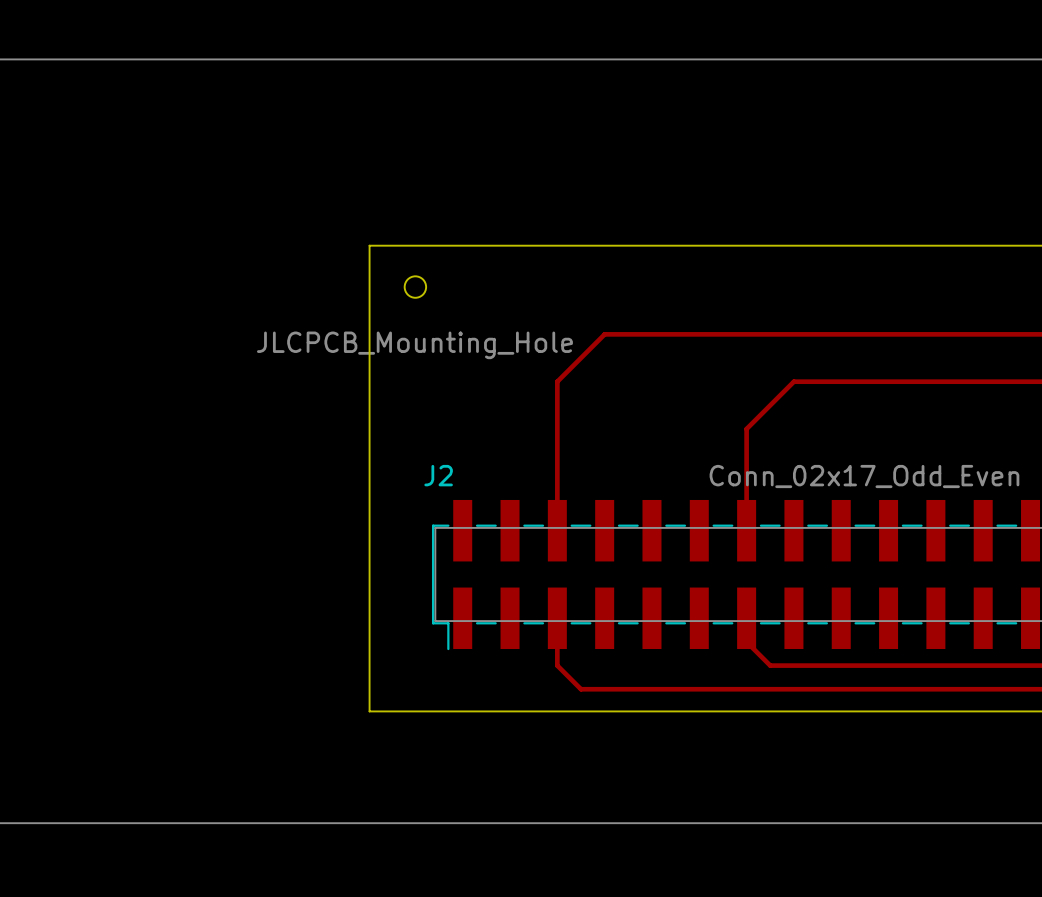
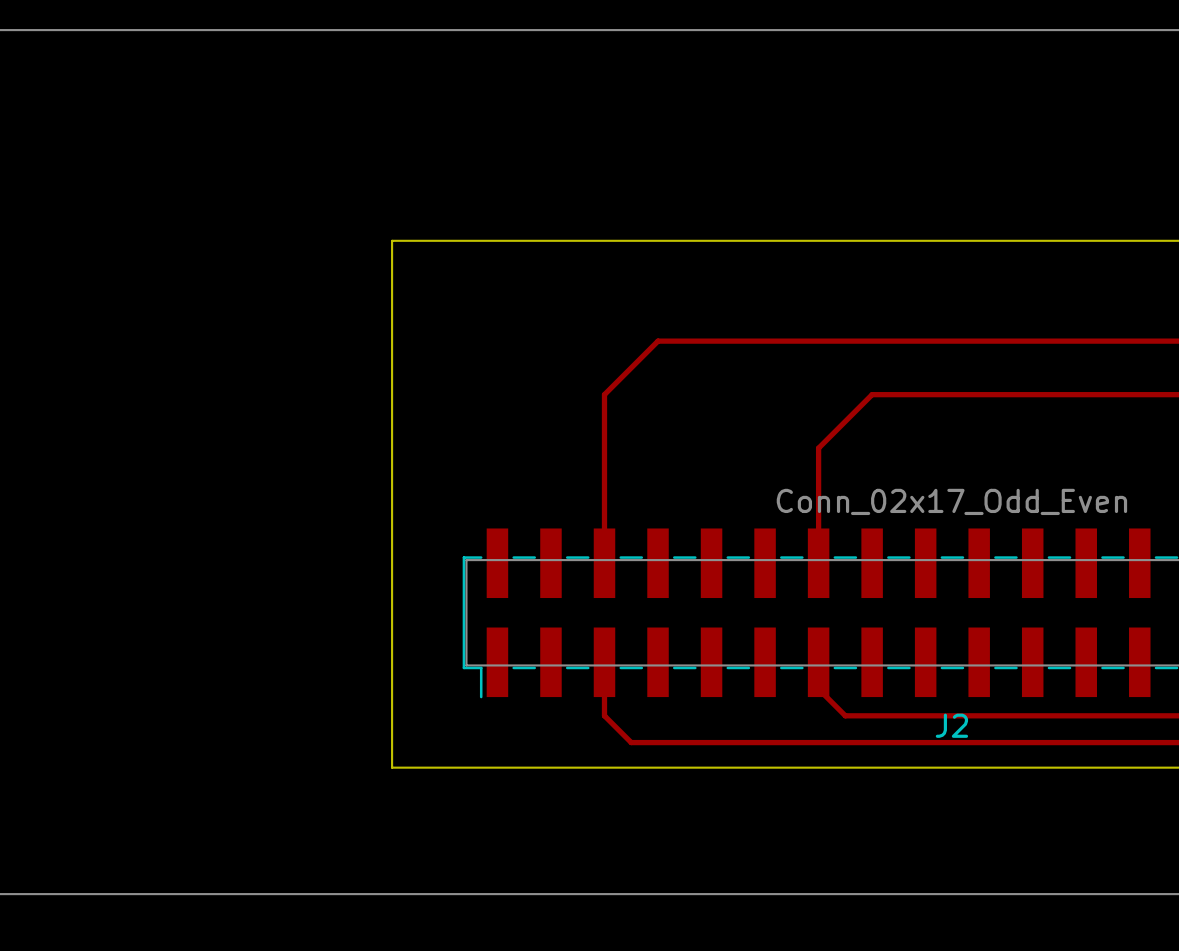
part: JLCPCB_Mounting_Hole (415, 287) -> none
J2 name position: J2 (438, 475) -> J2 (951, 725)

